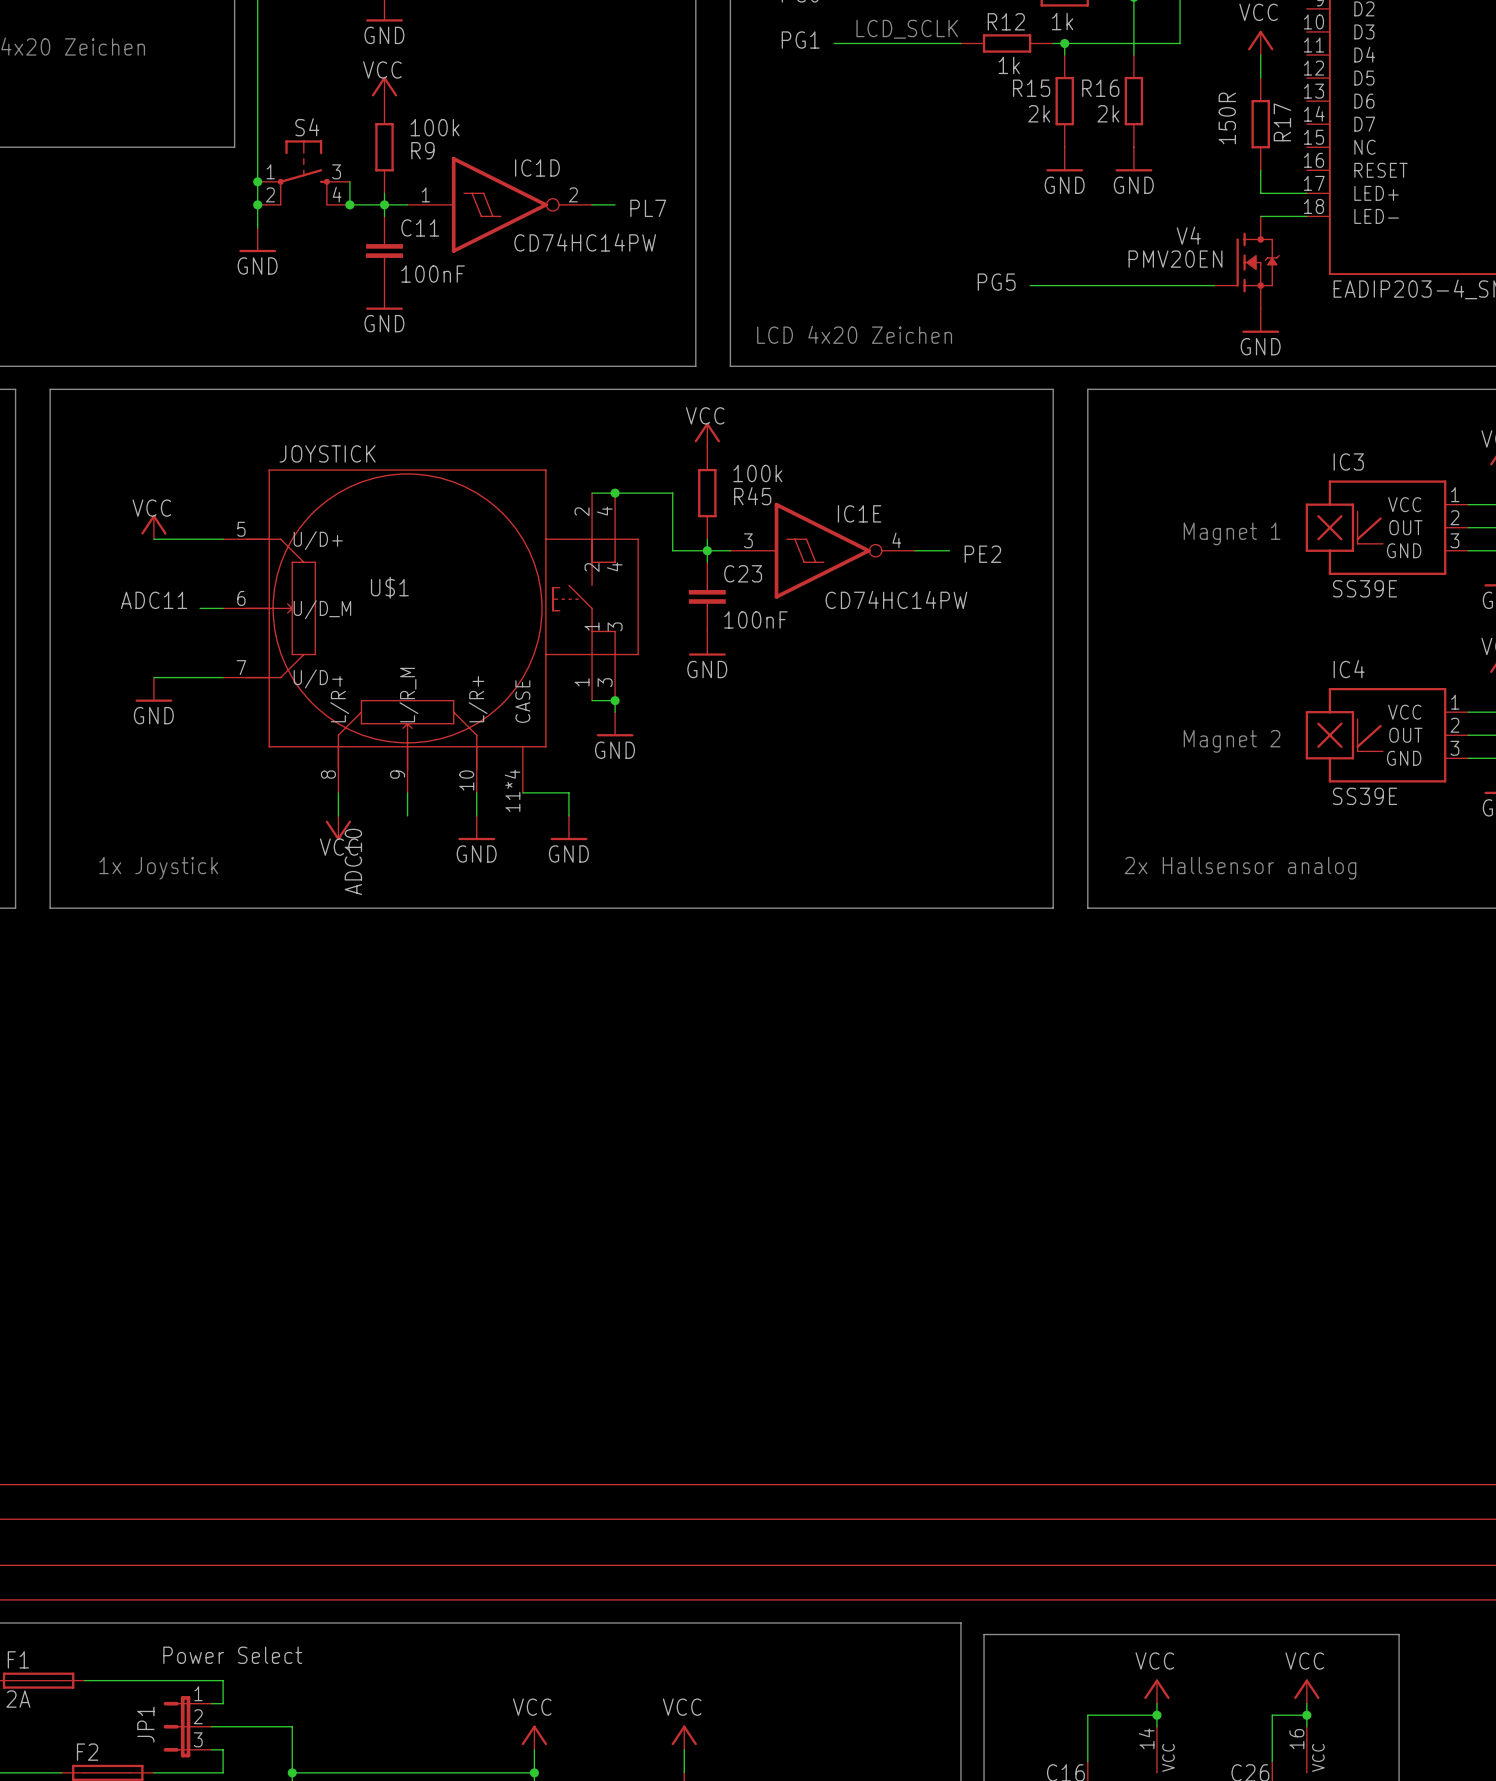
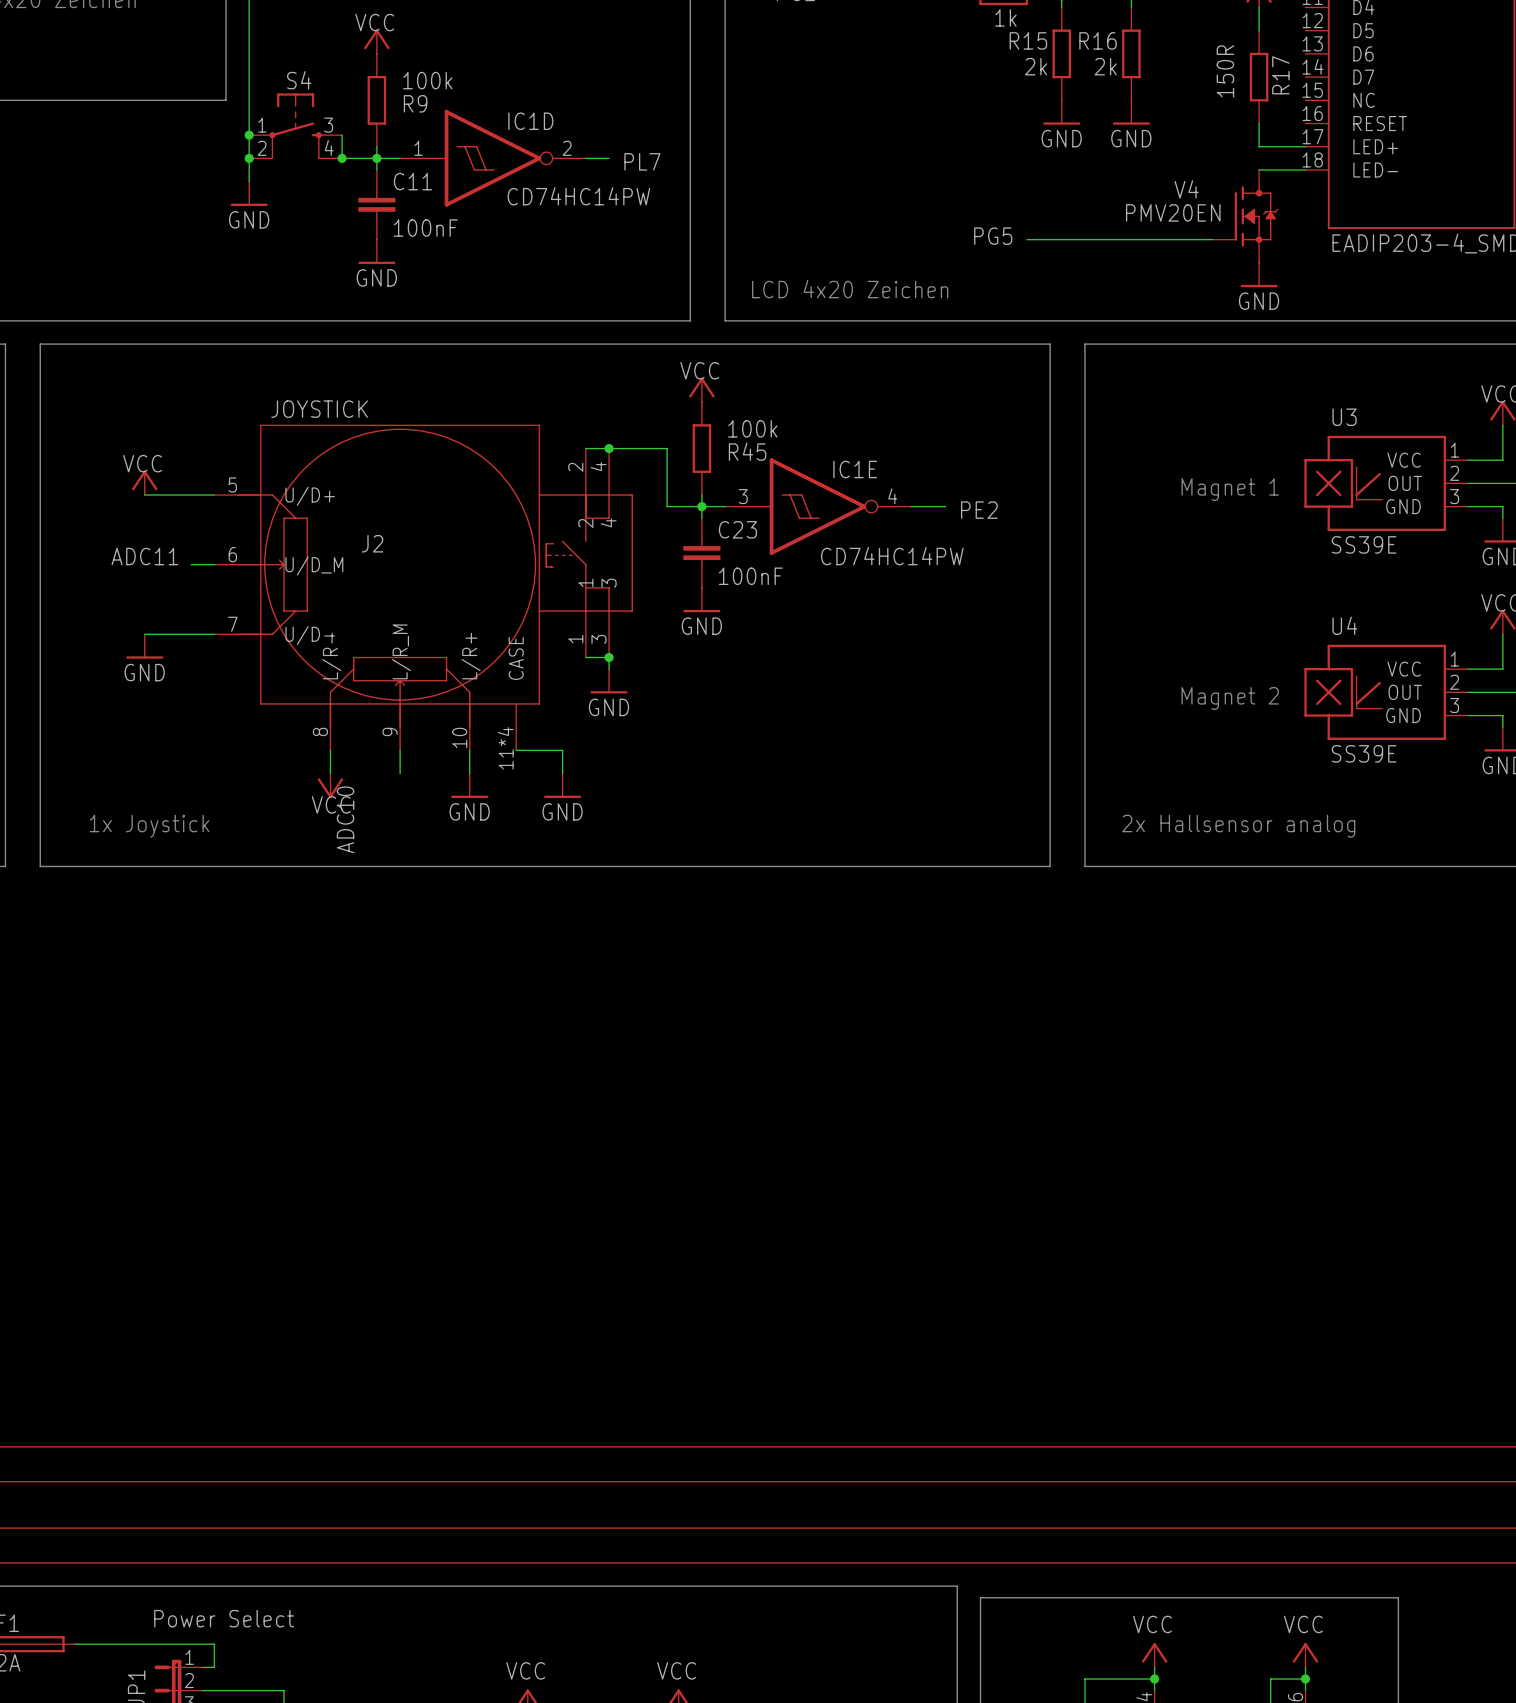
IC3 name: IC3 (1348, 461) -> U3 (1344, 417)
U$1 name: U$1 (389, 587) -> J2 (372, 543)
IC4 name: IC4 (1349, 669) -> U4 (1344, 625)

